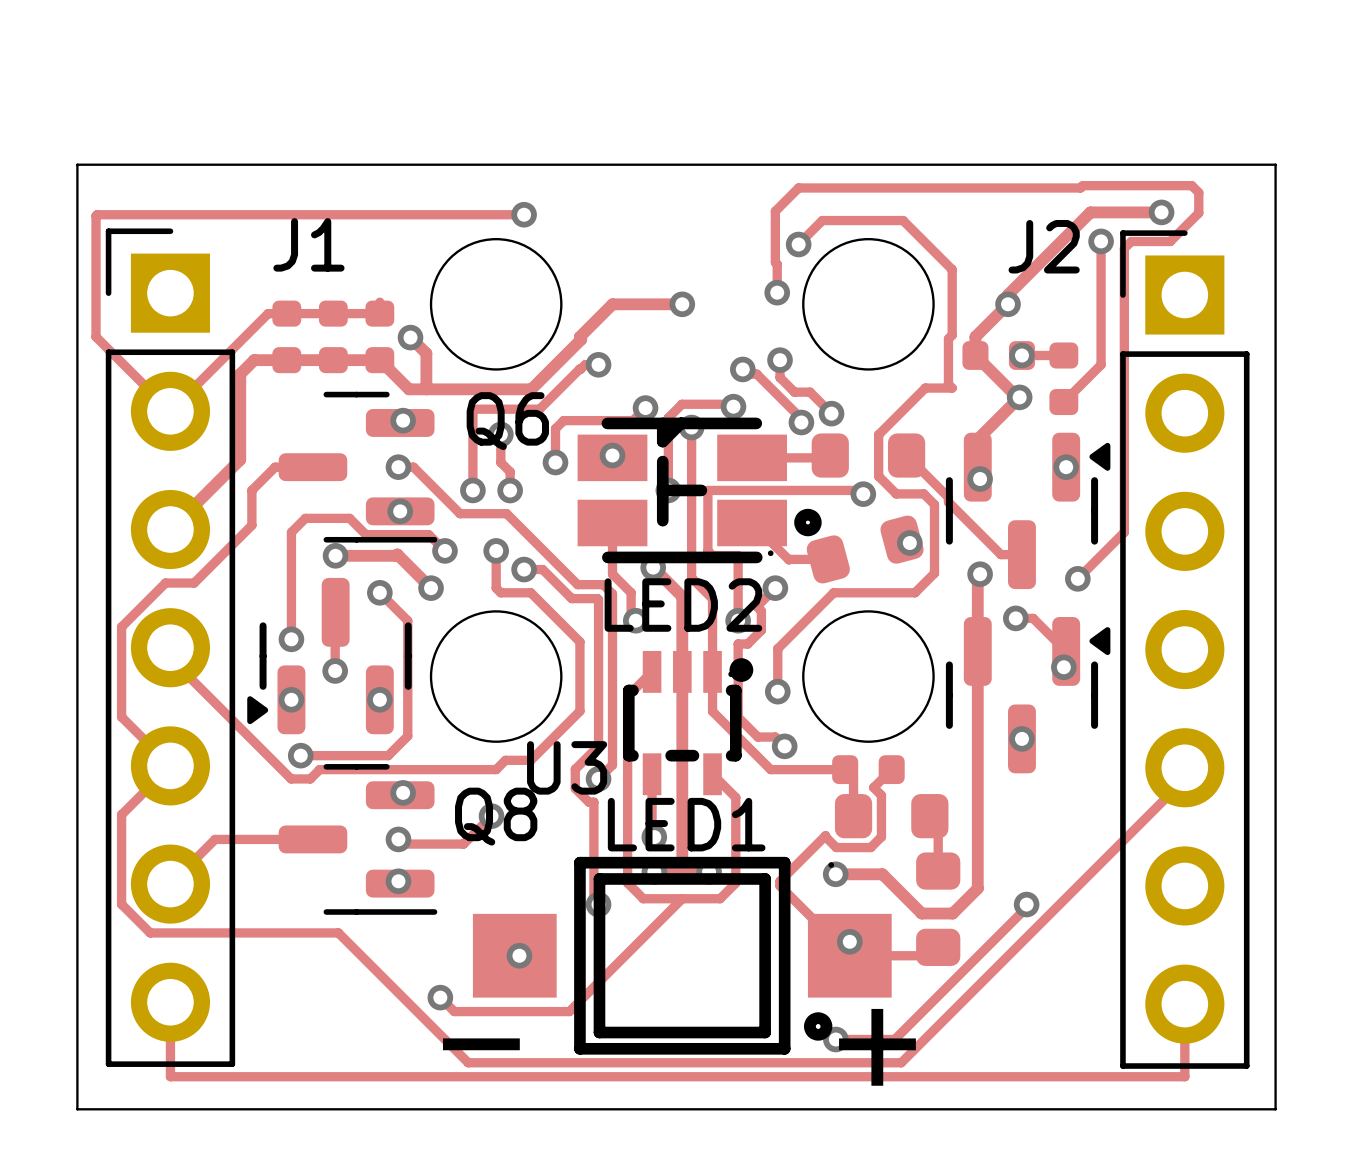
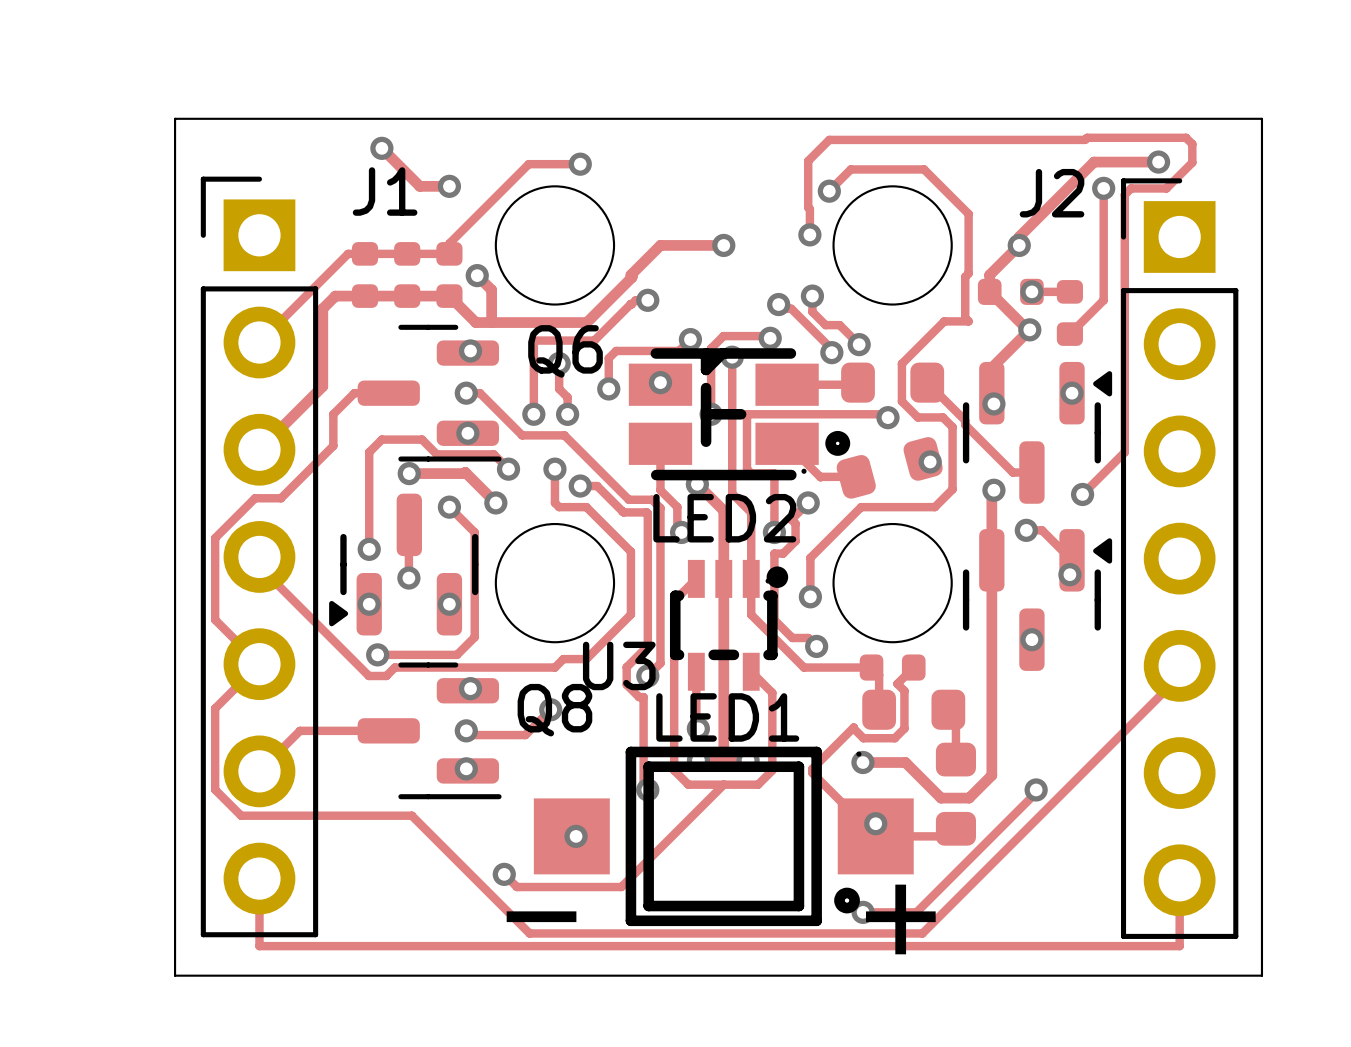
track: none -> (381, 148) (419, 186) (449, 186)
via: none -> (381, 148)
track: (467, 214) (97, 214) (96, 336) (170, 411) -> (528, 164) (449, 243)
via: none -> (449, 186)

